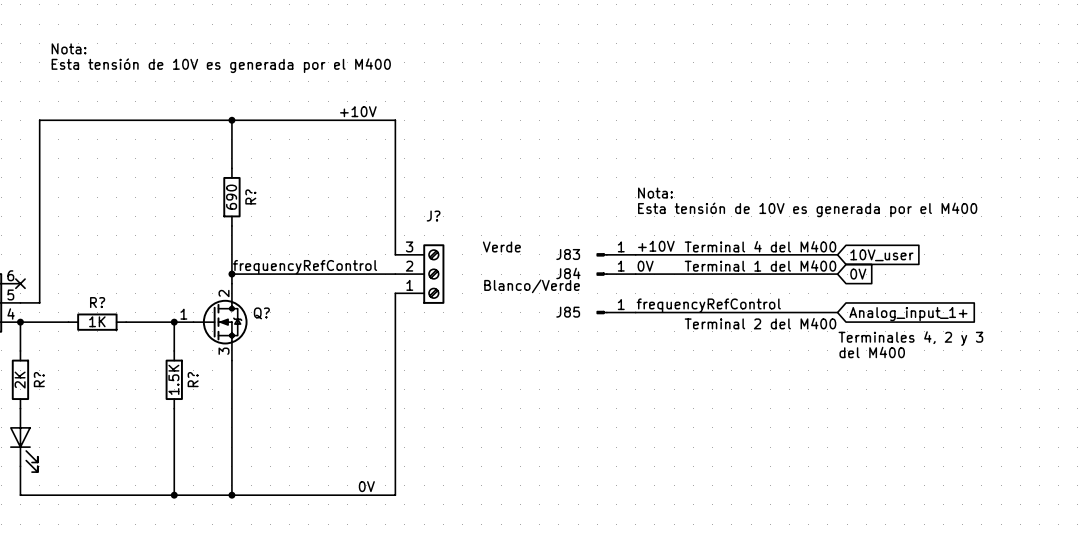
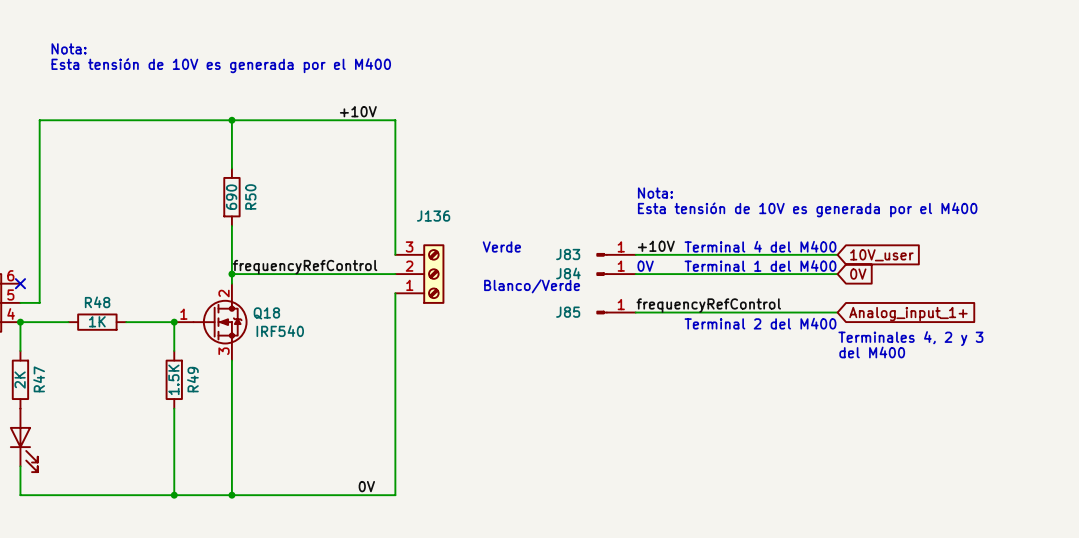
R? name: R? (250, 196) -> R50 (250, 196)
J? name: J? (433, 216) -> J136 (433, 216)
R? name: R? (97, 302) -> R48 (97, 302)
Q? name: Q? (261, 313) -> Q18 (266, 313)
Q? value: none -> IRF540 (280, 331)
R? name: R? (39, 379) -> R47 (39, 379)
R? name: R? (193, 379) -> R49 (192, 379)

